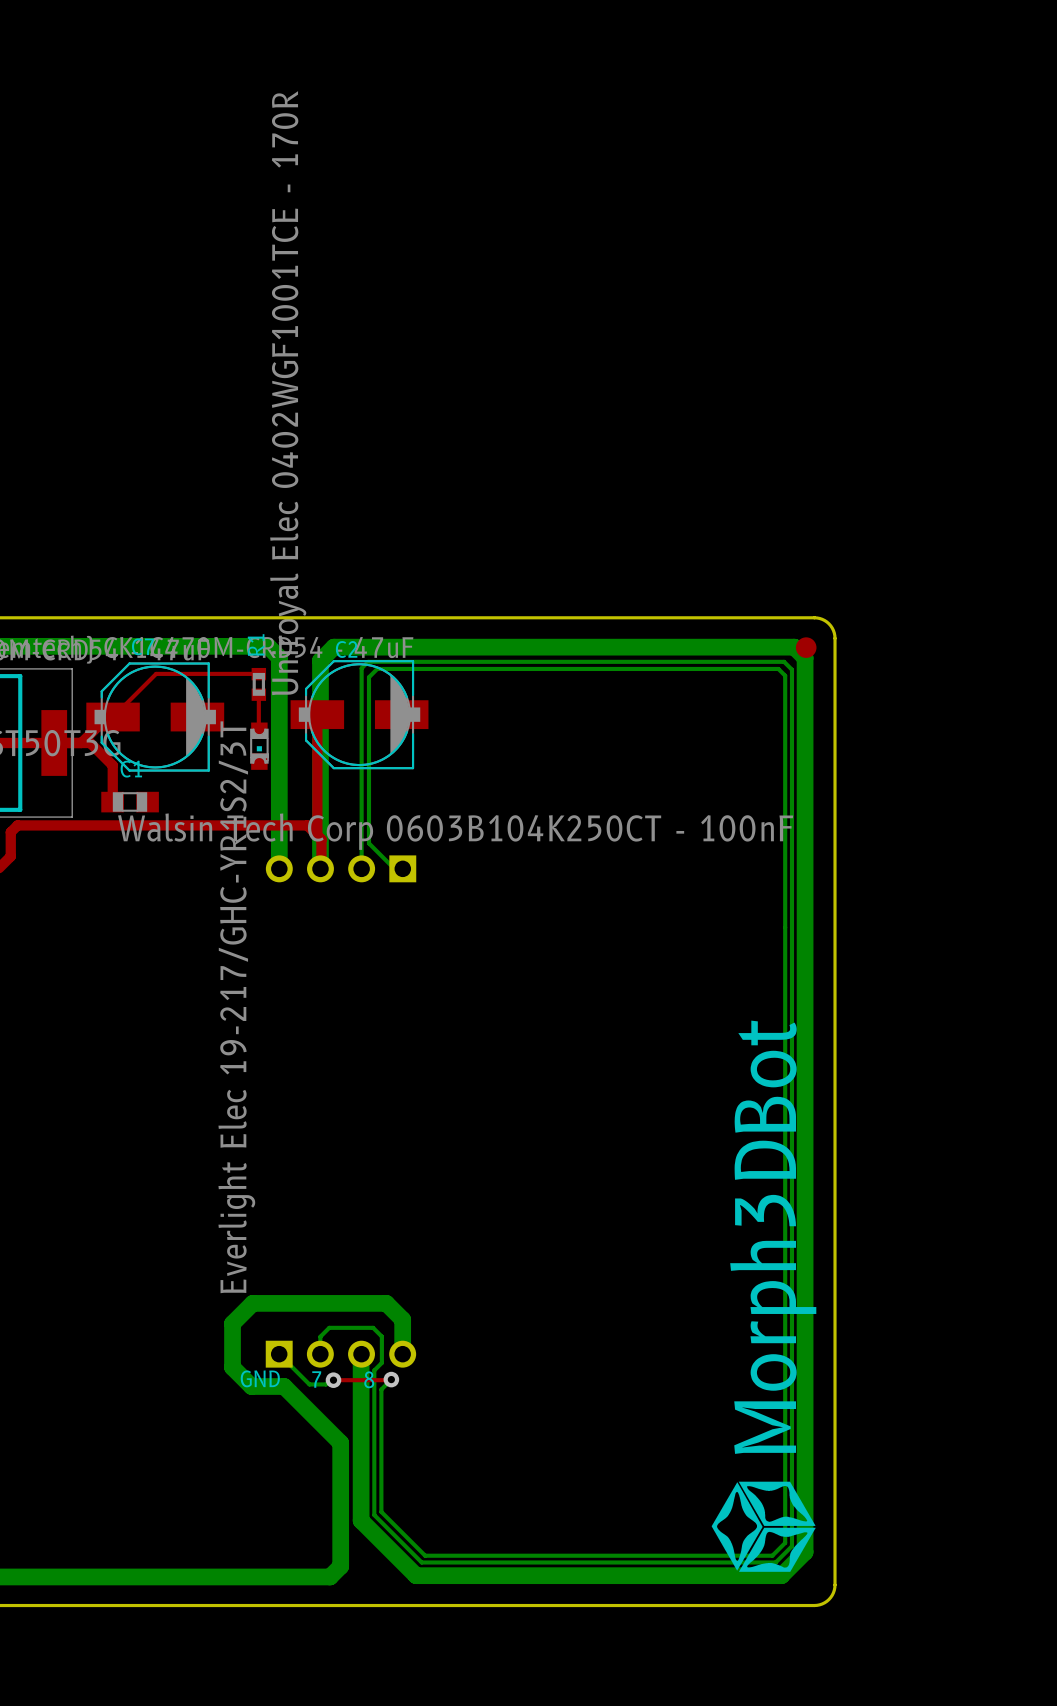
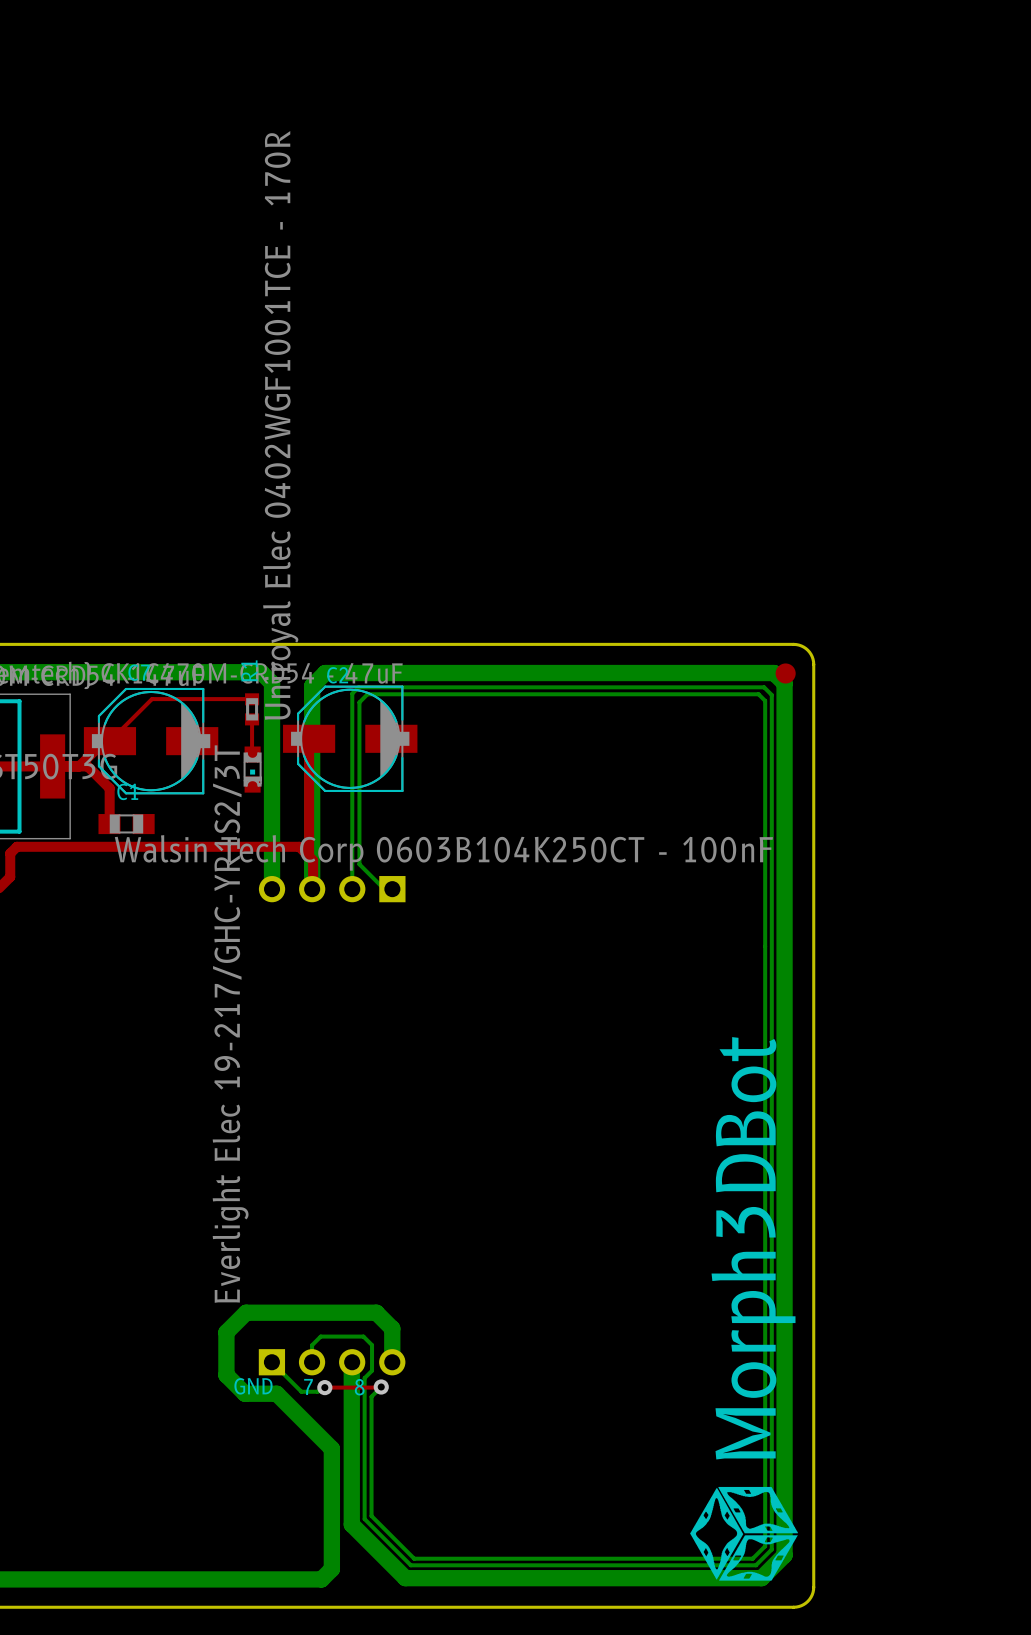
drawing shape: [711, 1020, 817, 1572] -> [690, 1037, 798, 1581]

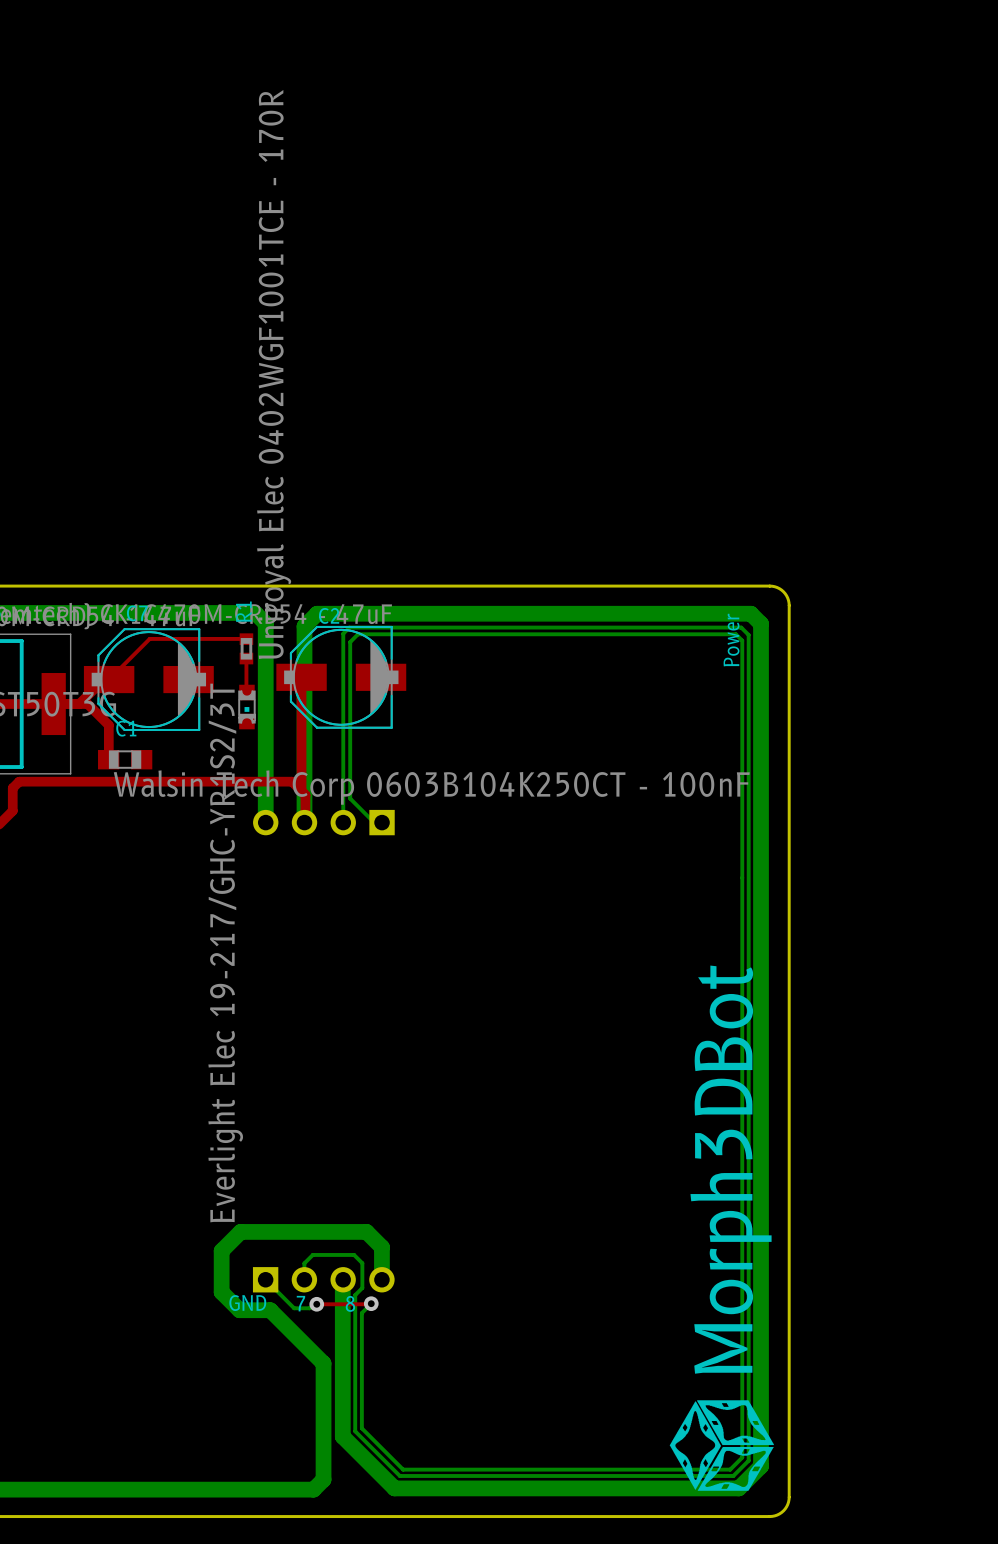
part: (785, 673) -> none
text: none -> Power (731, 640)

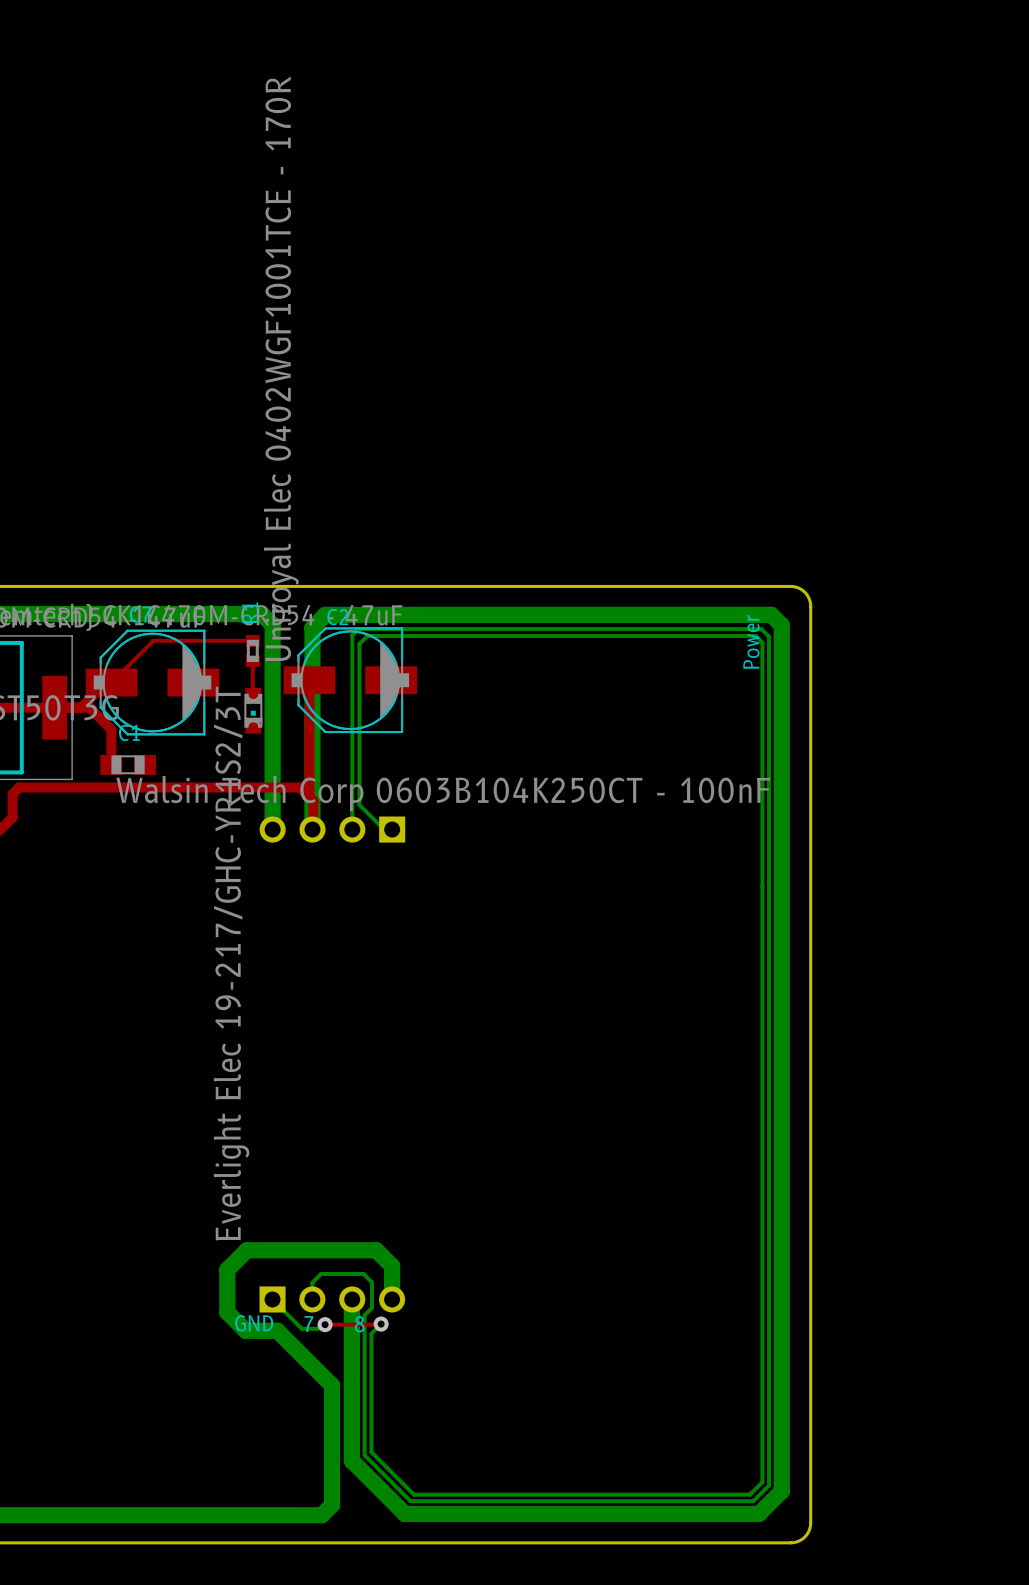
drawing: [669, 1400, 774, 1491] -> none

